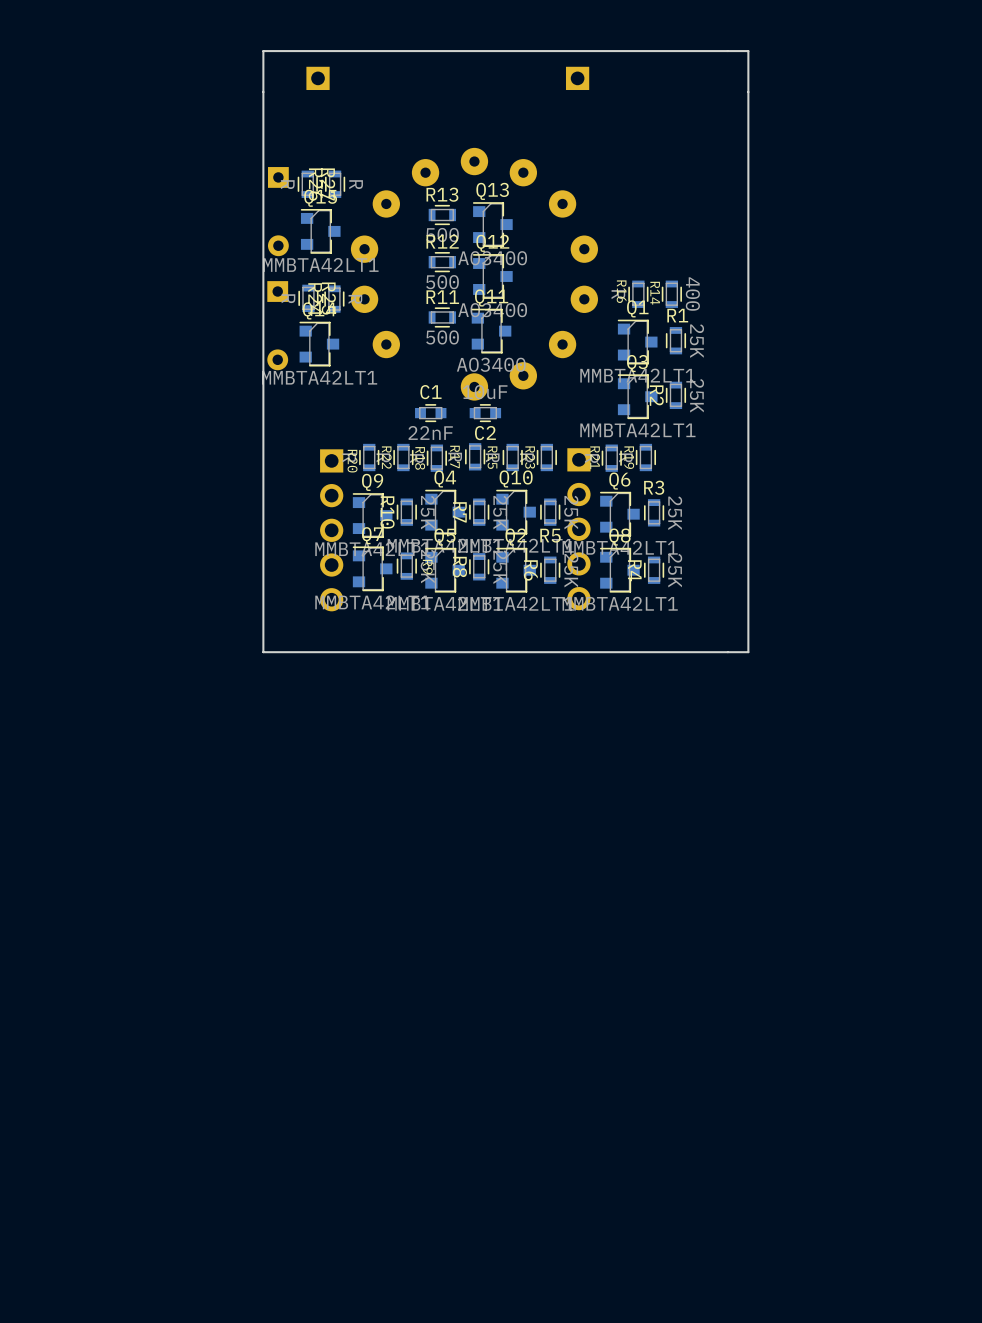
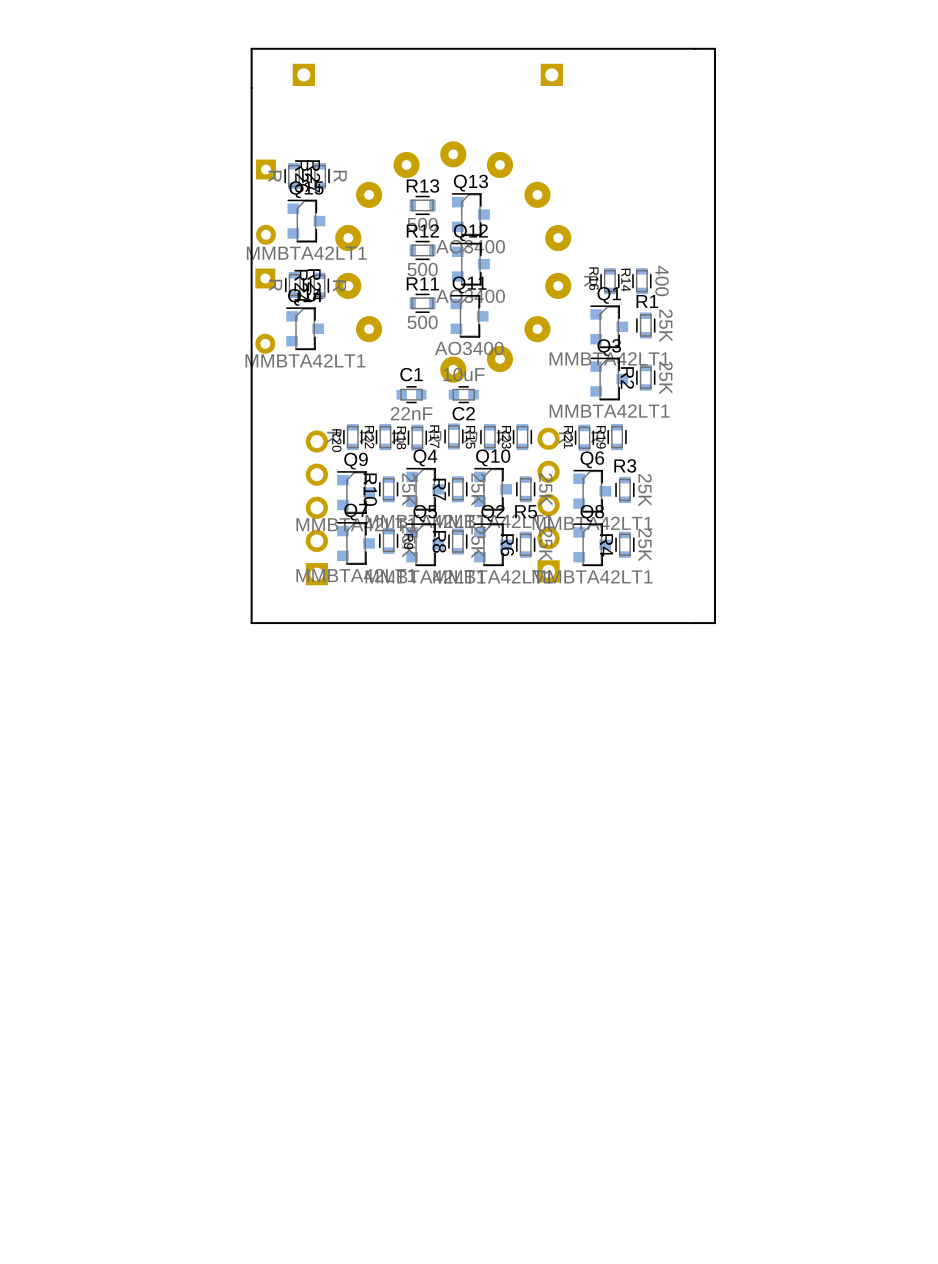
part rotation: 0° (578, 529) -> 180° (548, 505)
part rotation: 0° (331, 530) -> 180° (316, 507)

